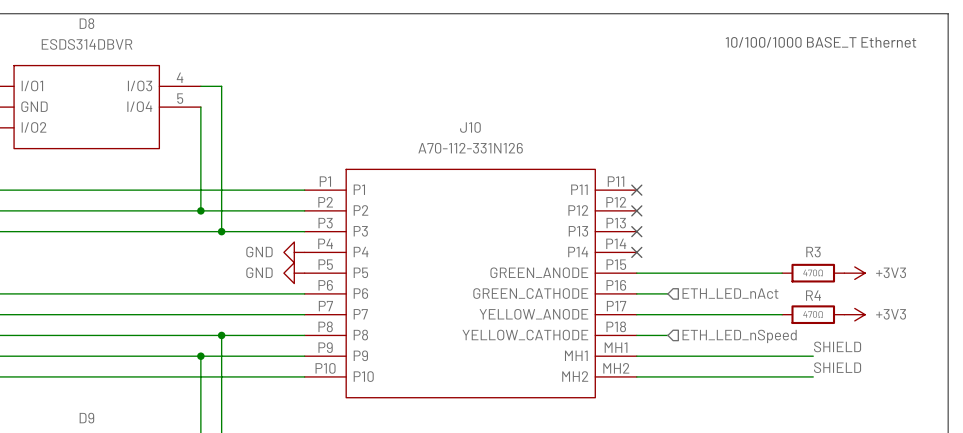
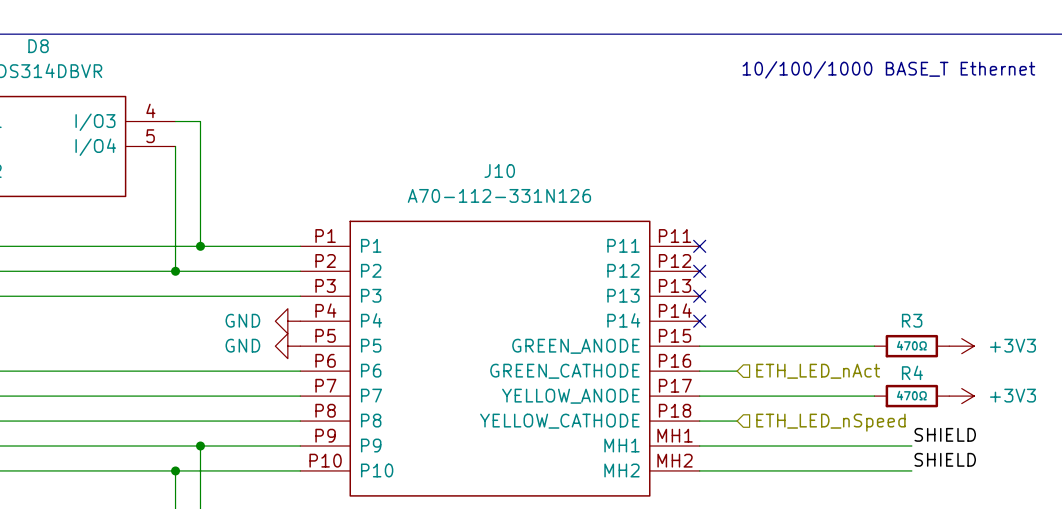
wire: (221, 190) (221, 231) -> none
junction position: (221, 231) -> (200, 246)
wire: (221, 335) (221, 356) -> none
junction: (221, 335) -> none
wire: (200, 356) (200, 376) -> none
junction: (200, 356) -> none
junction: none -> (200, 446)
junction: none -> (175, 470)

